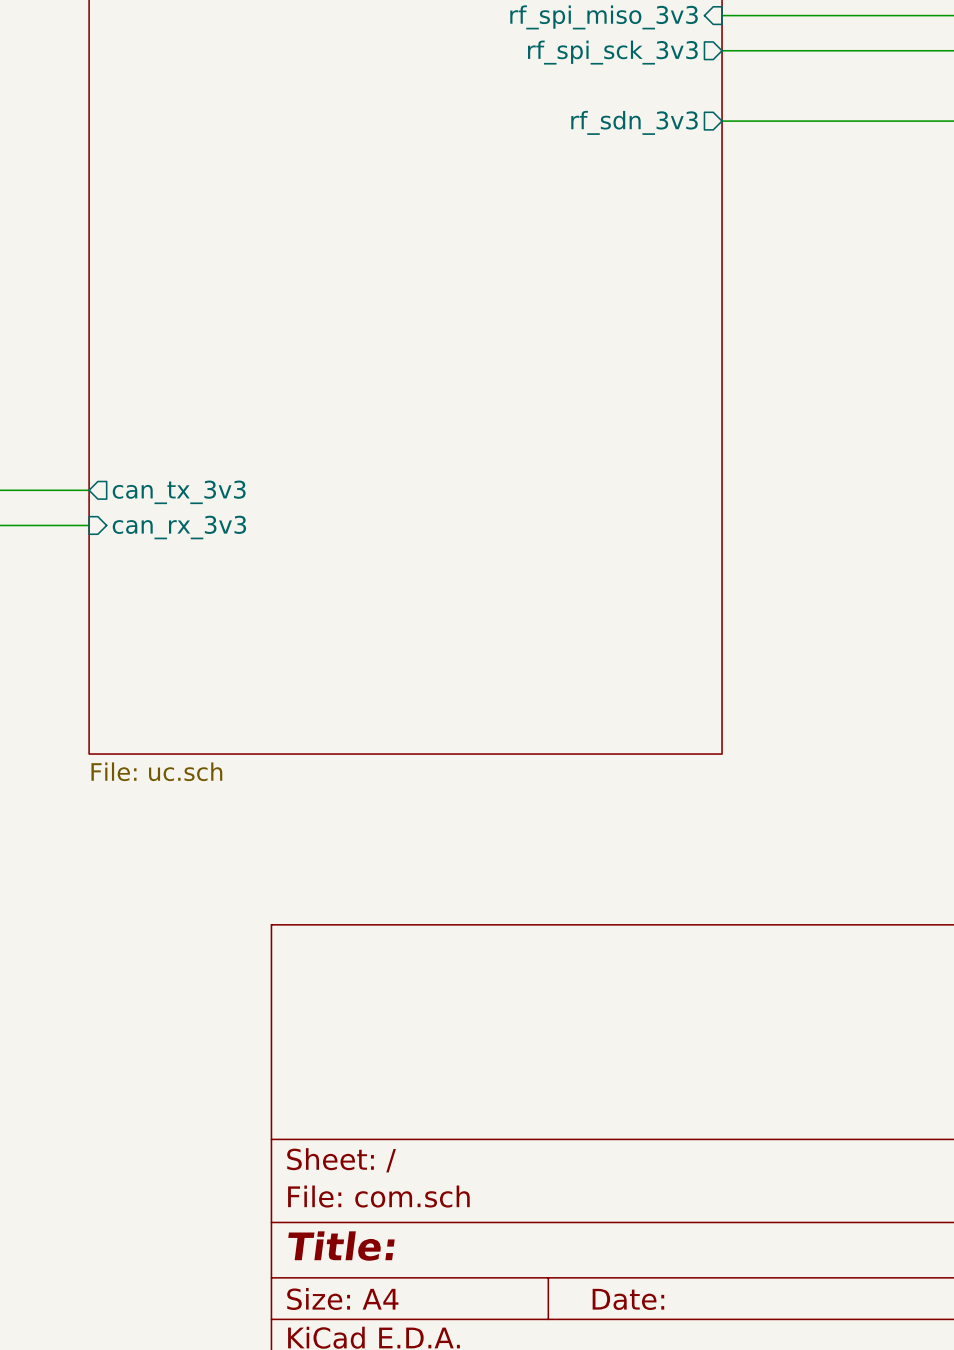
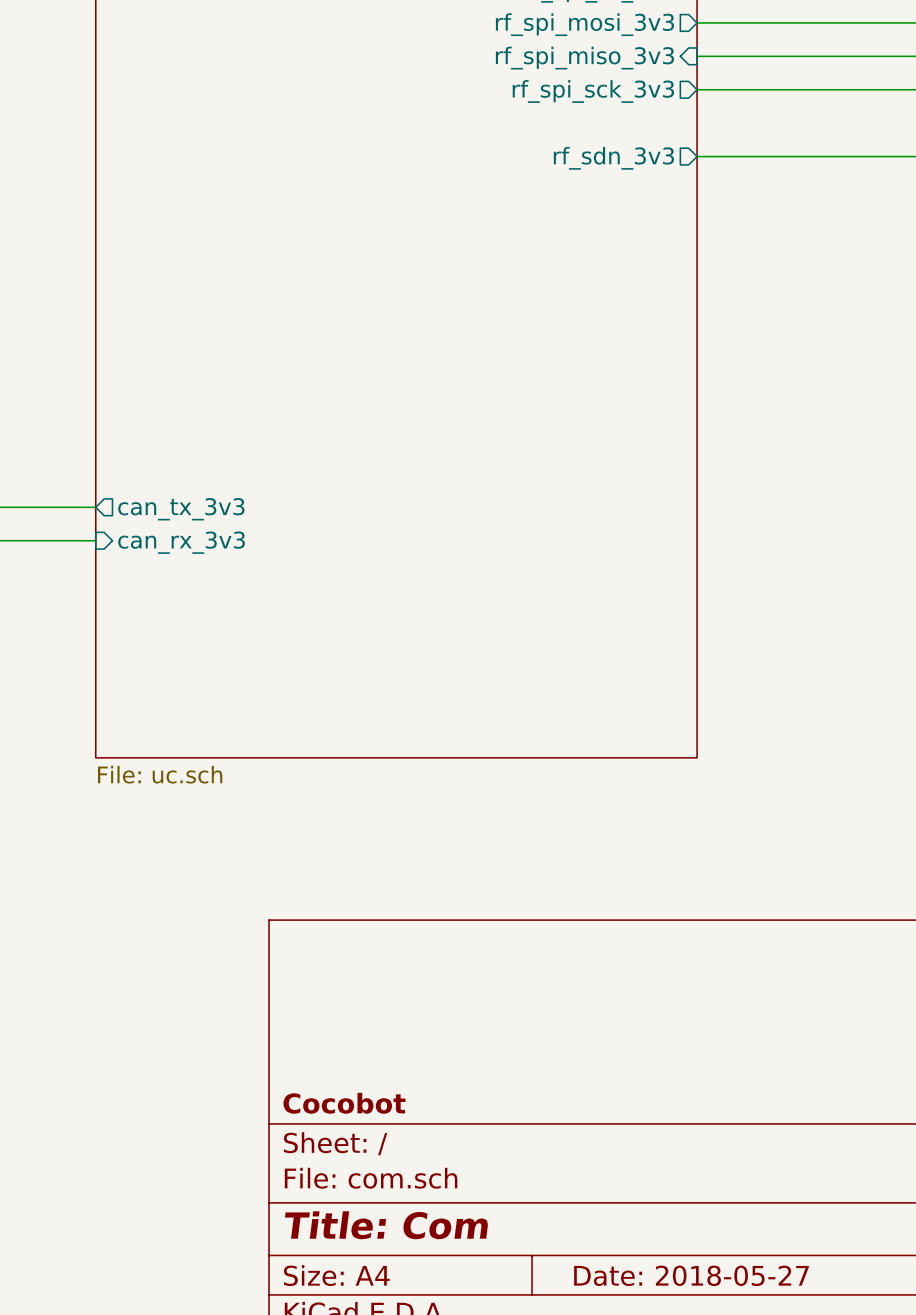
title block: none -> Cocobot (344, 1103)
title block: Title: (341, 1246) -> Title: Com (386, 1225)
title block: Date: (628, 1299) -> Date: 2018-05-27 (691, 1275)

